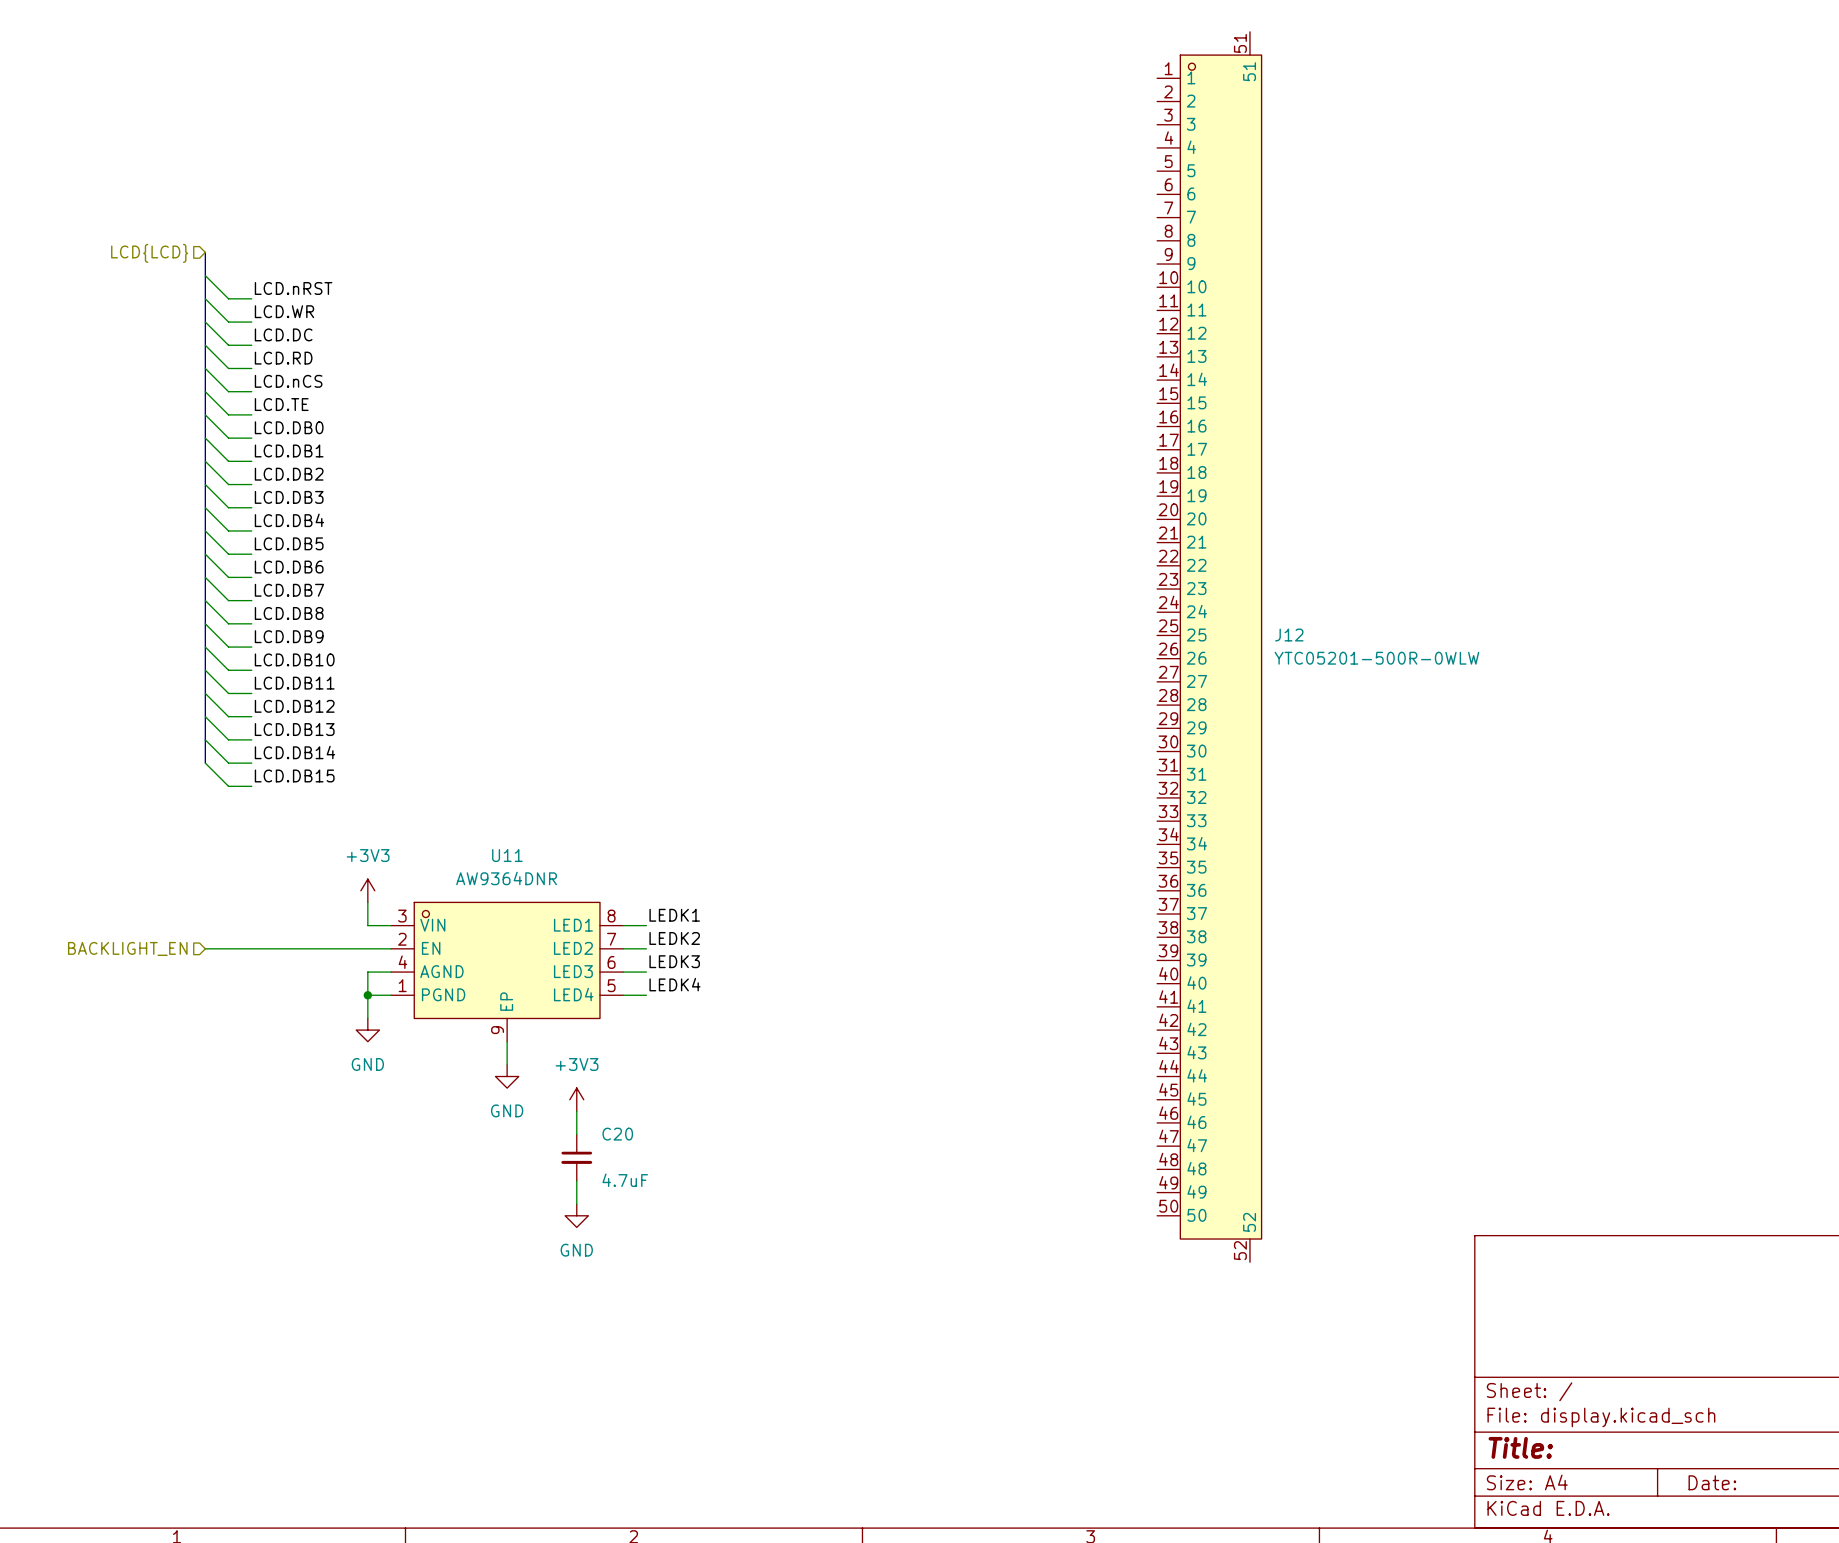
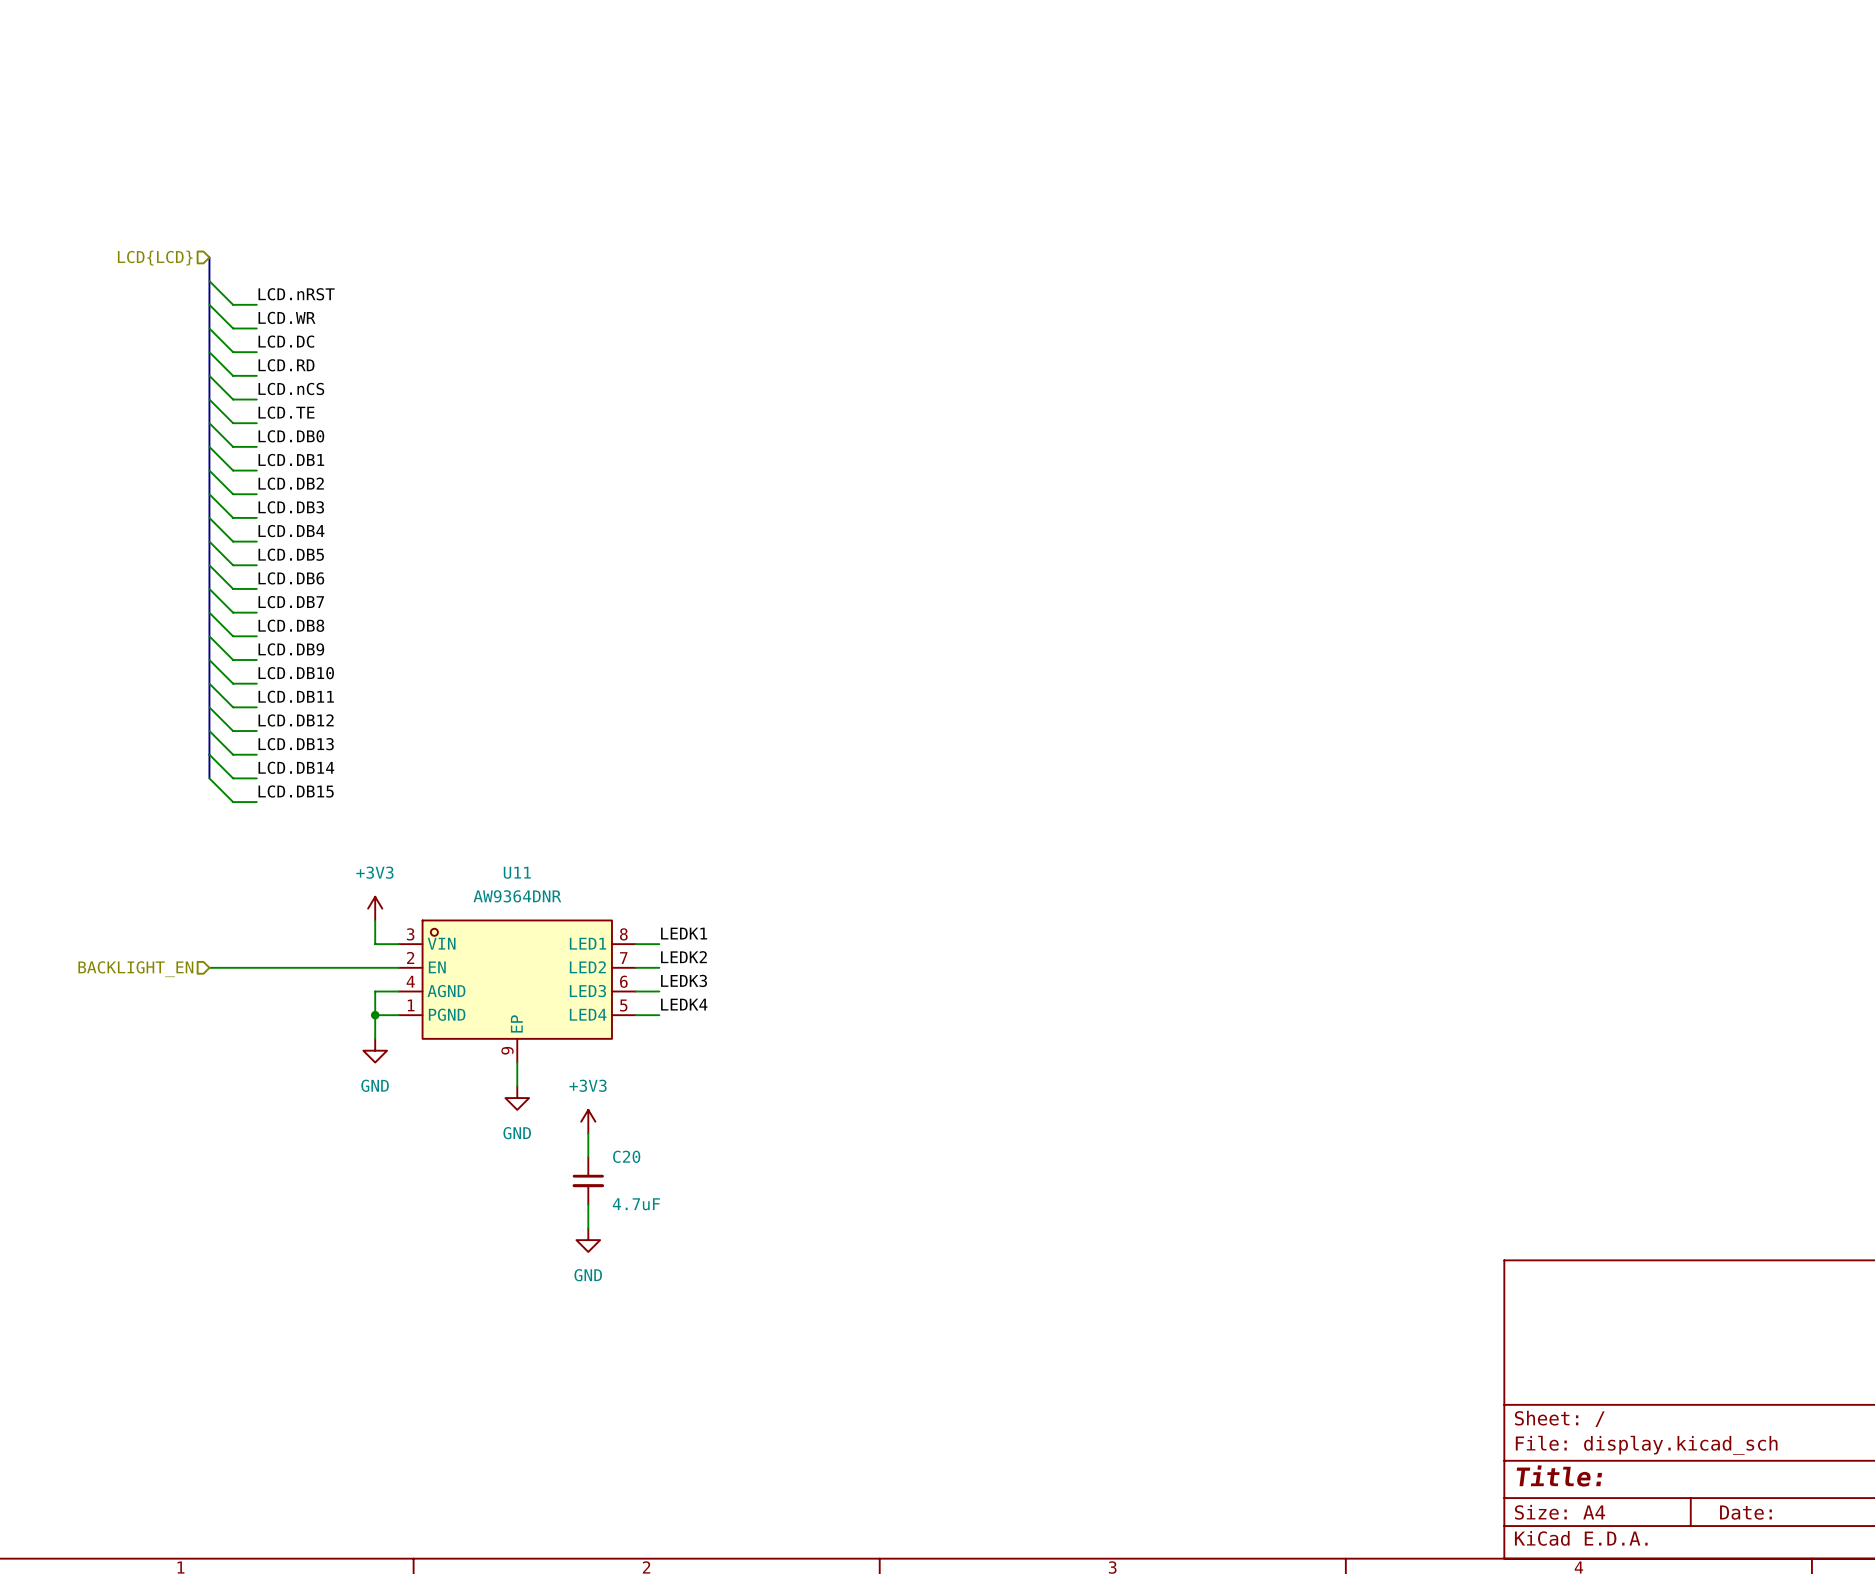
J12: YTC05201-500R-0WLW (1209, 647) -> none

